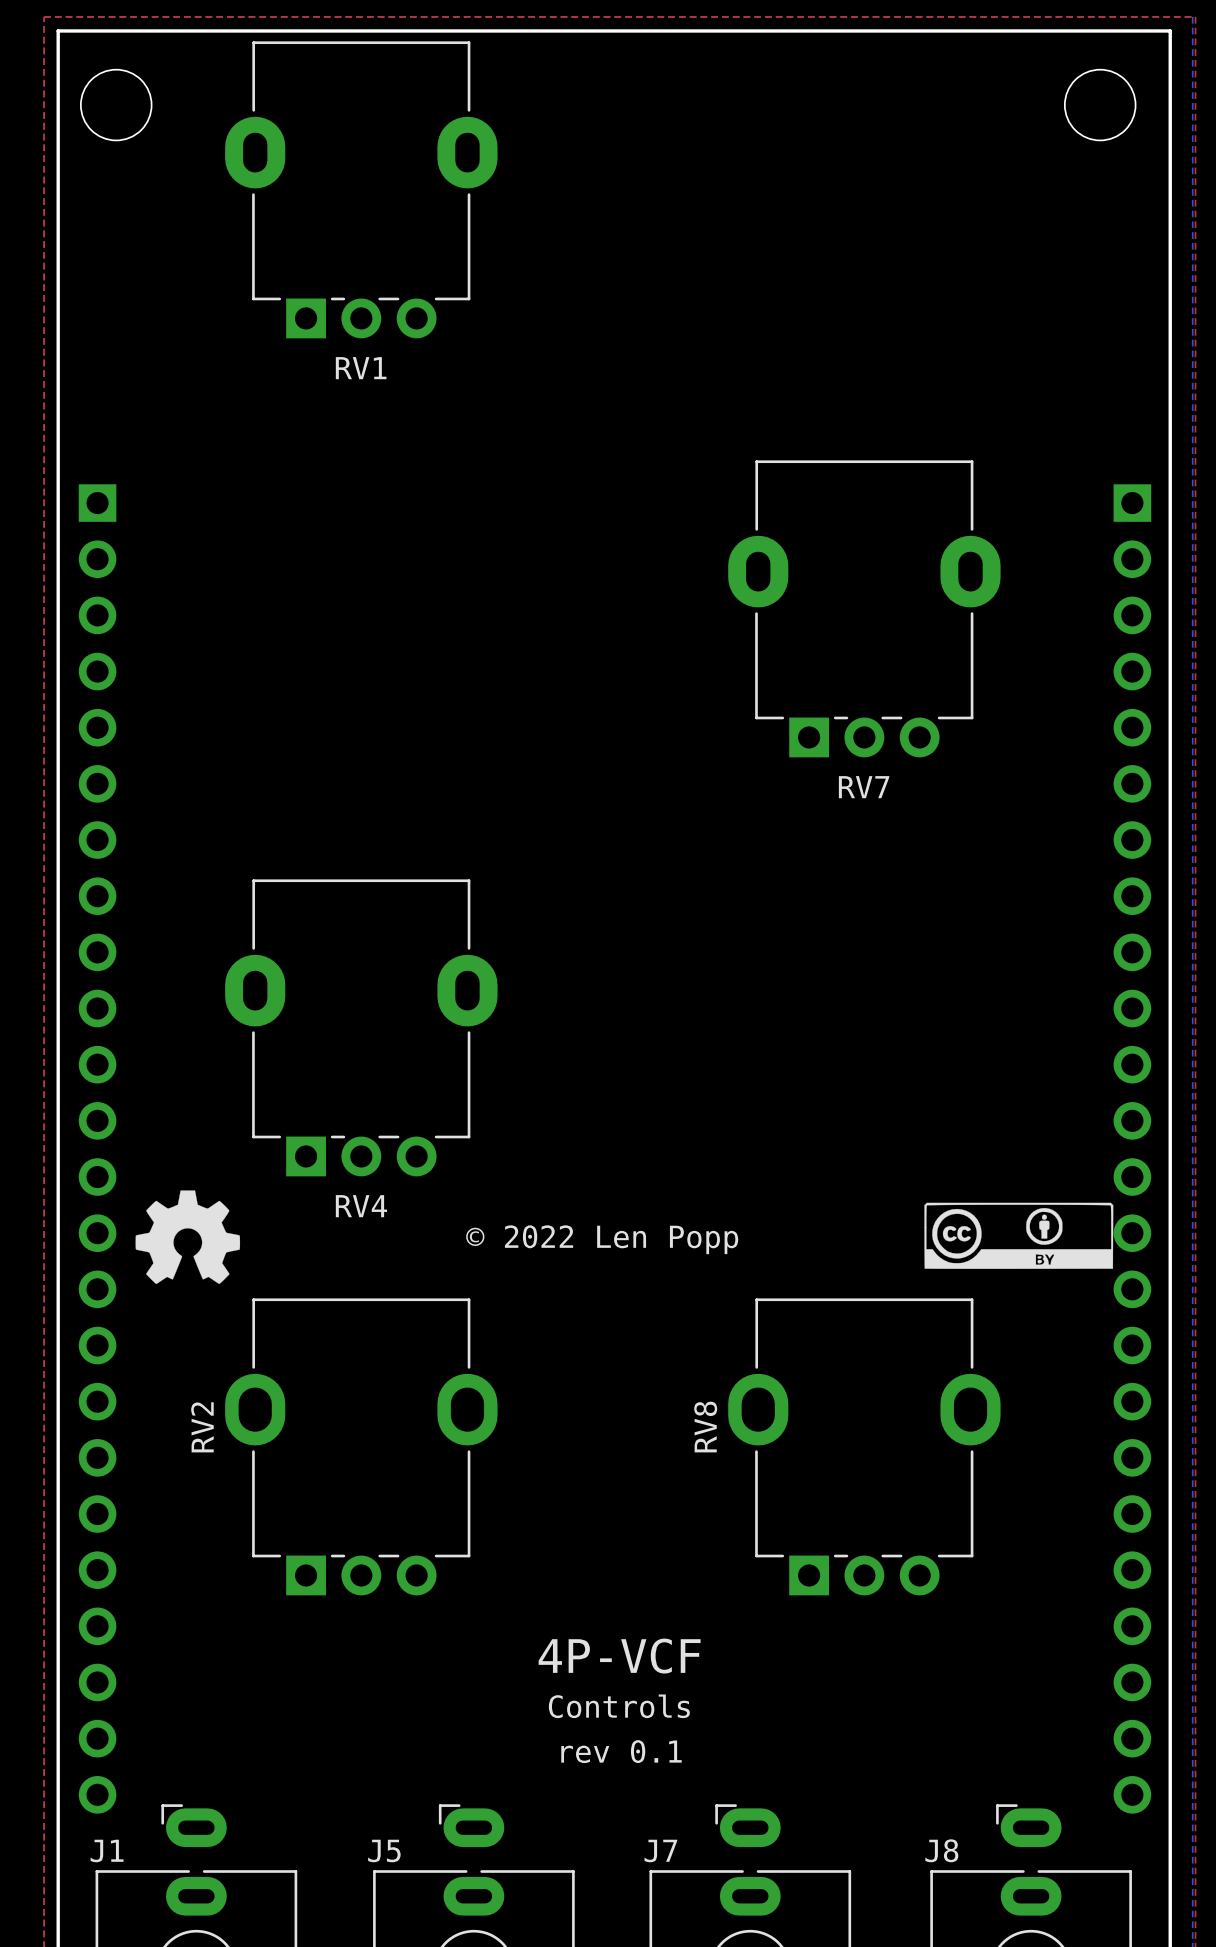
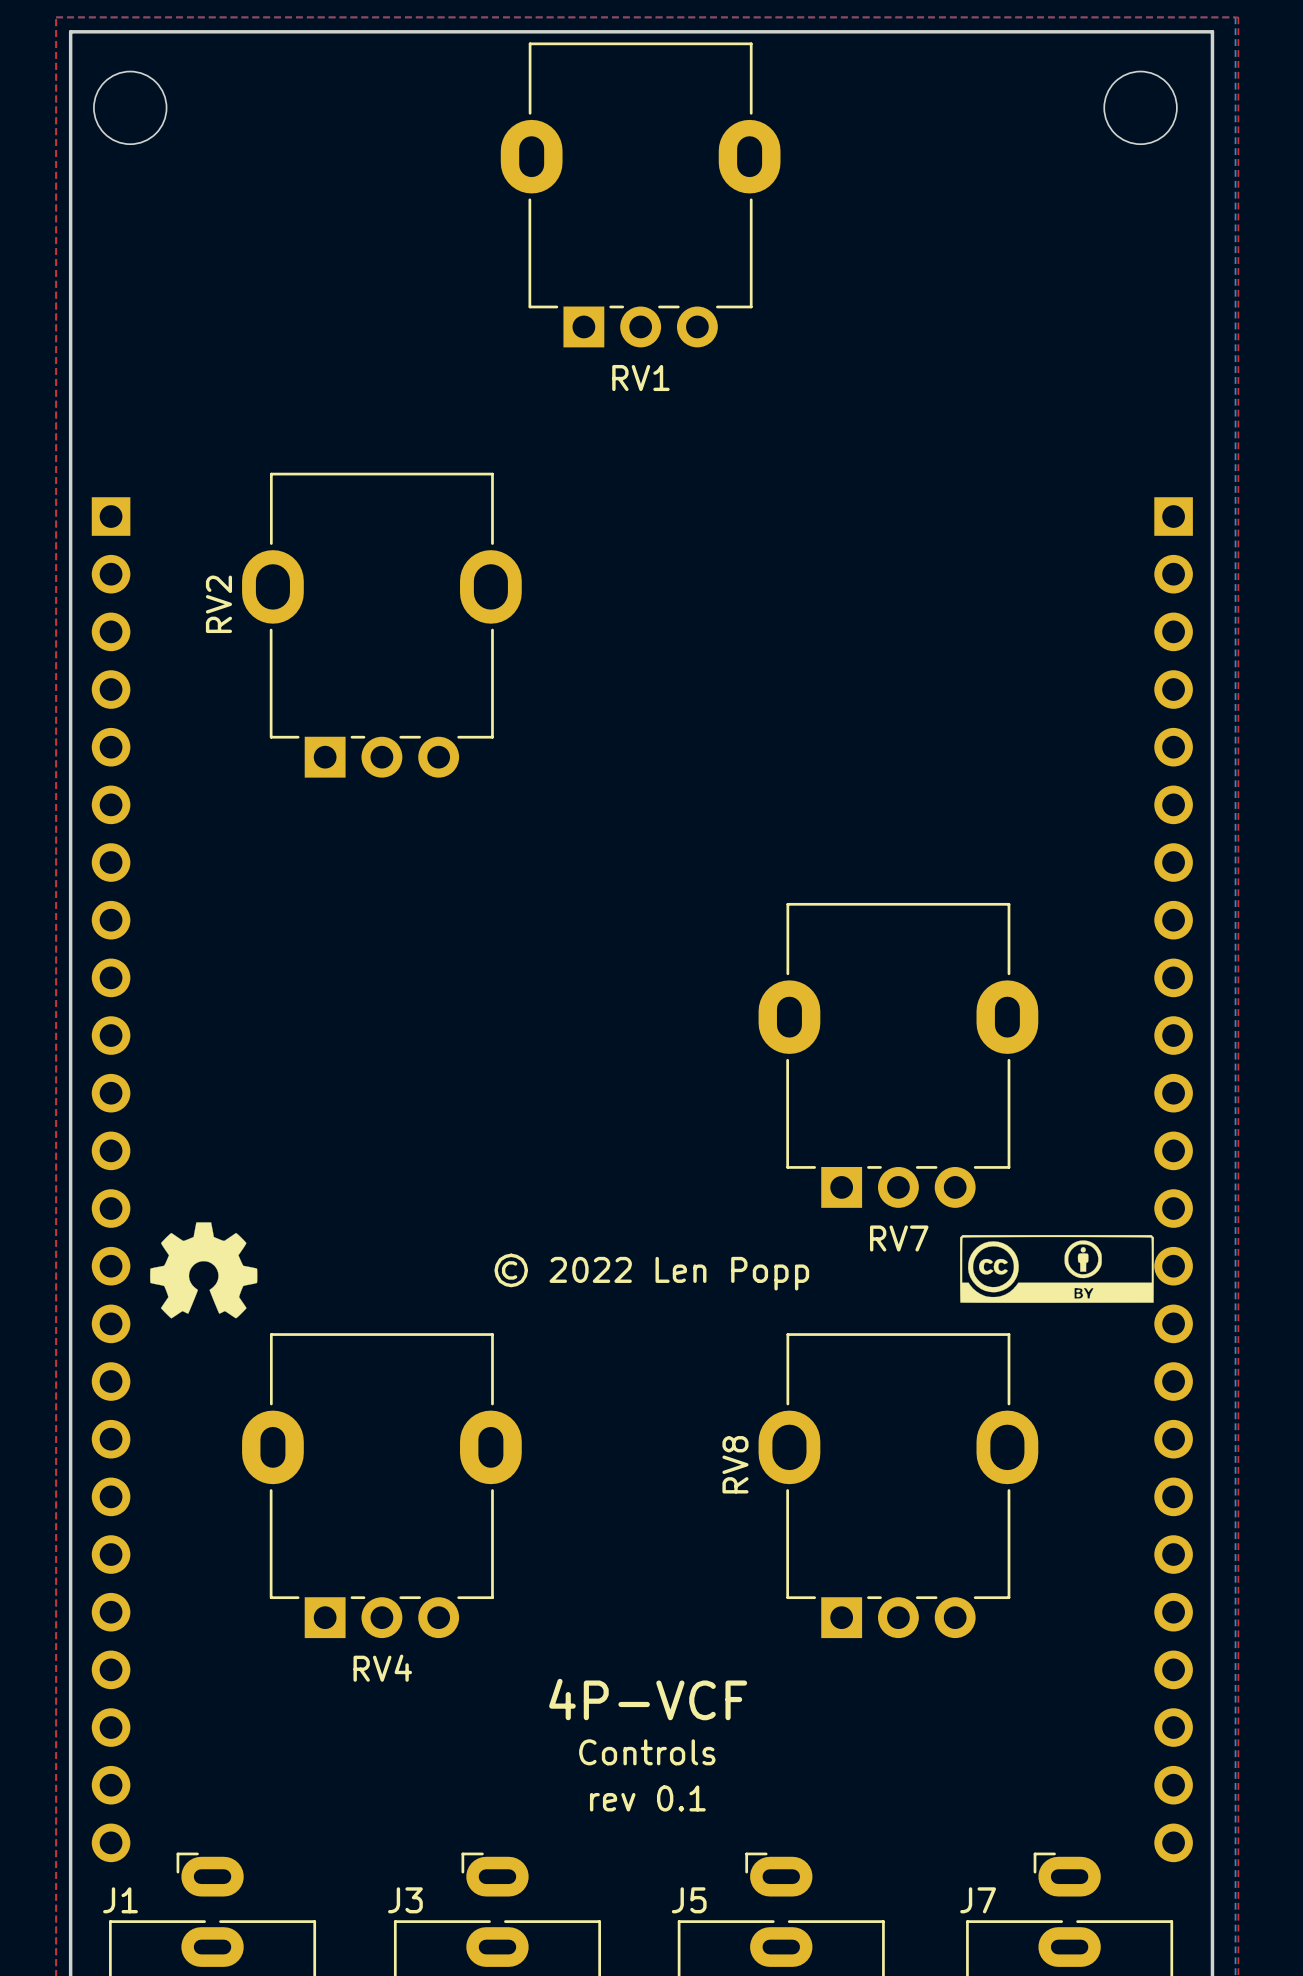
RV1 position: (361, 189) -> (640, 194)
RV7 position: (864, 608) -> (898, 1055)
RV4 position: (361, 1027) -> (381, 1485)
RV2 position: (361, 1446) -> (381, 625)
J5 name: J5 (384, 1850) -> J3 (405, 1900)
J7 name: J7 (660, 1850) -> J5 (689, 1900)
J8 name: J8 (941, 1850) -> J7 (978, 1900)

